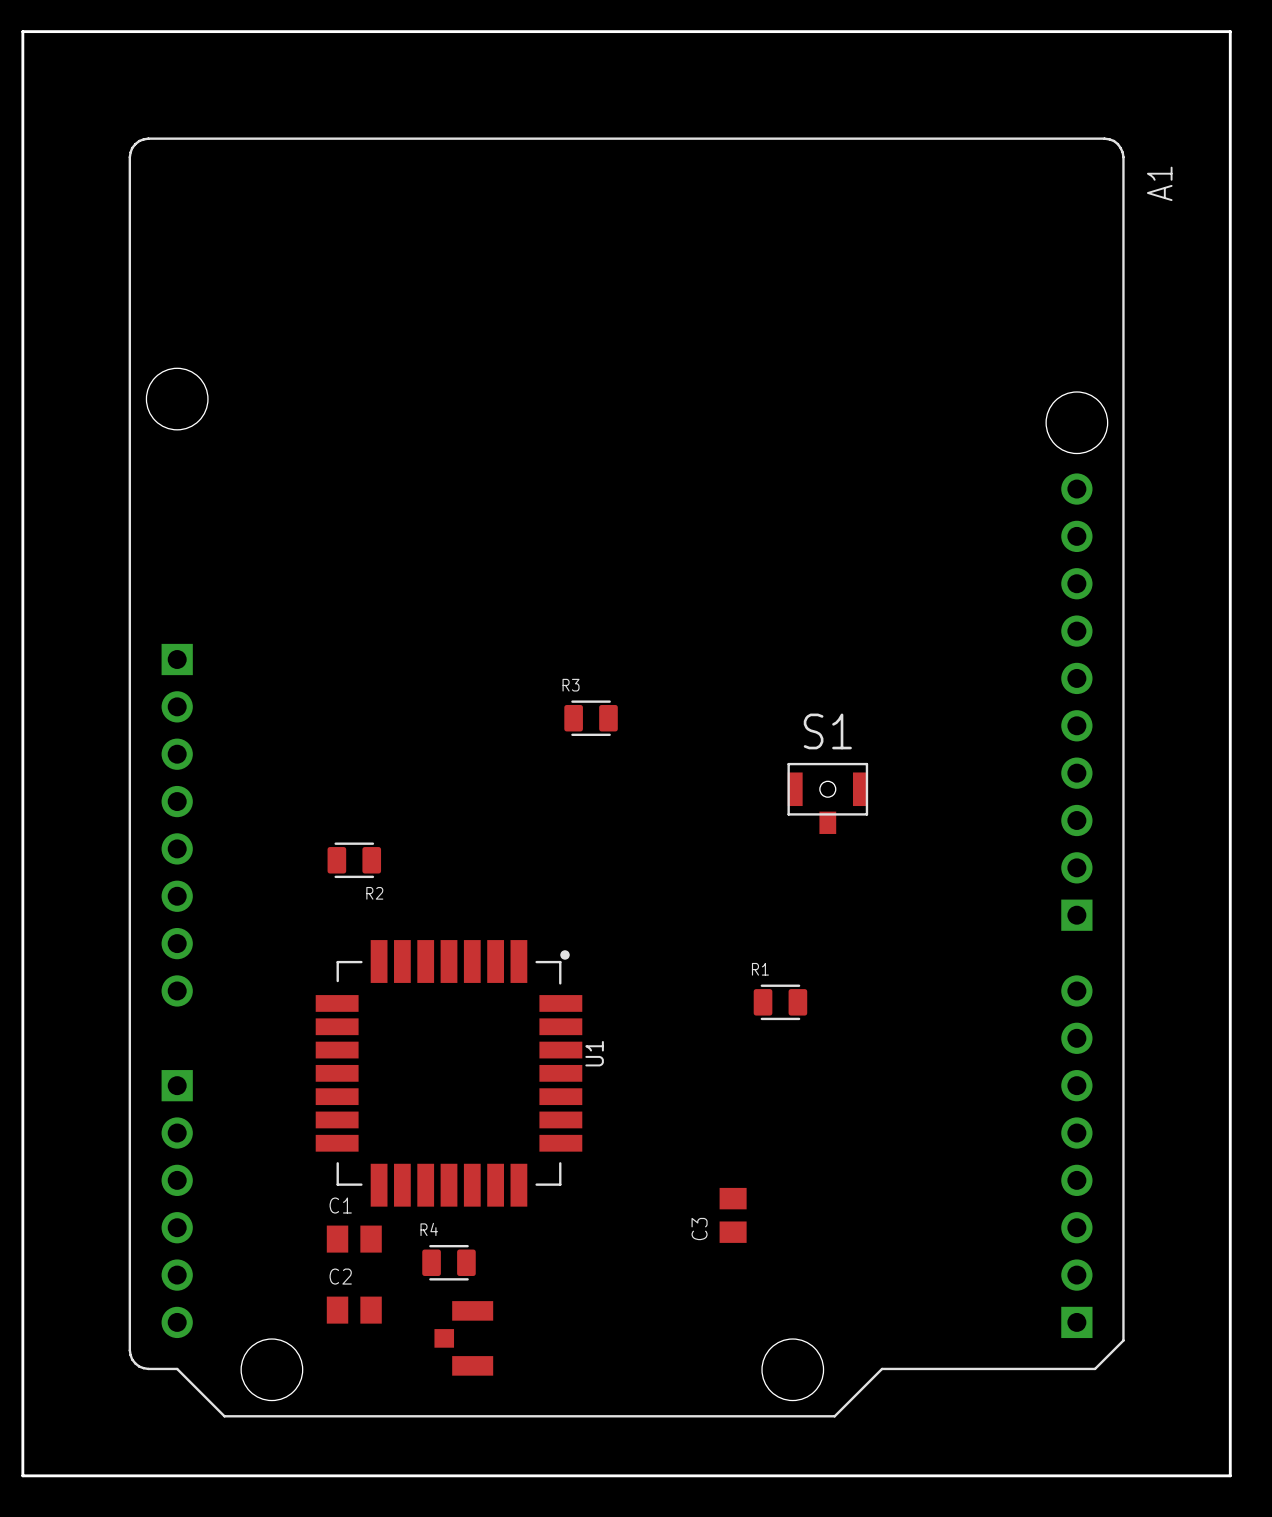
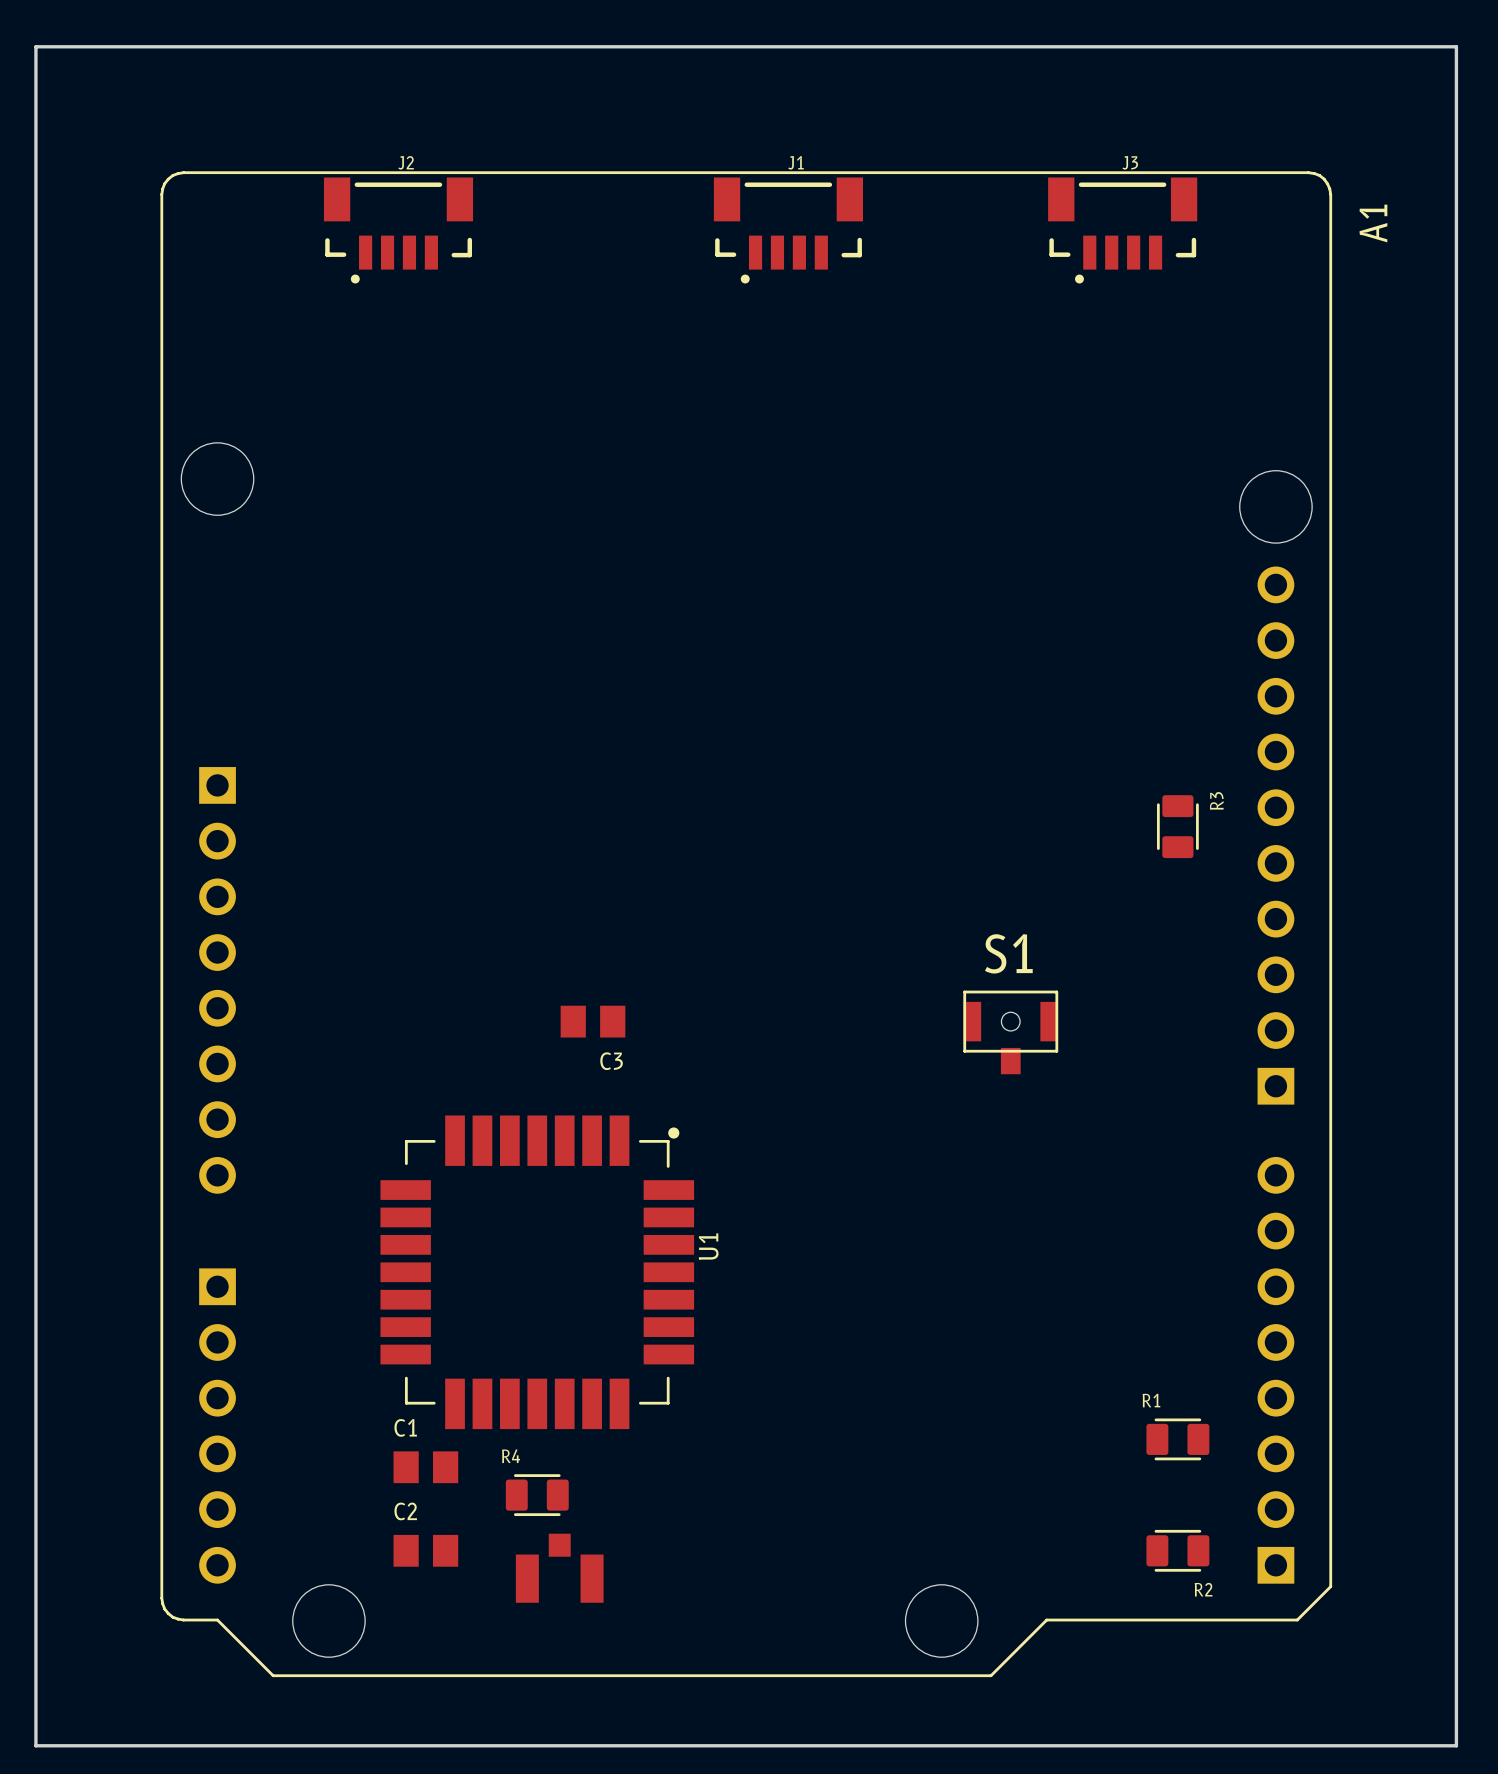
J2: none -> (398, 230)
J1: none -> (788, 230)
J3: none -> (1122, 230)
R3 rotation: 0° (591, 718) -> 90° clockwise (1177, 826)
R3 position: (591, 718) -> (1177, 826)
S1 position: (827, 798) -> (1010, 1032)
R2 position: (354, 860) -> (1177, 1550)
R1 position: (780, 1002) -> (1177, 1439)
C3 rotation: 0° (733, 1215) -> 90° clockwise (592, 1021)
C3 position: (733, 1215) -> (592, 1021)
C3 name position: C3 (699, 1229) -> C3 (611, 1061)
part rotation: 0° (463, 1338) -> 90° clockwise (559, 1568)

